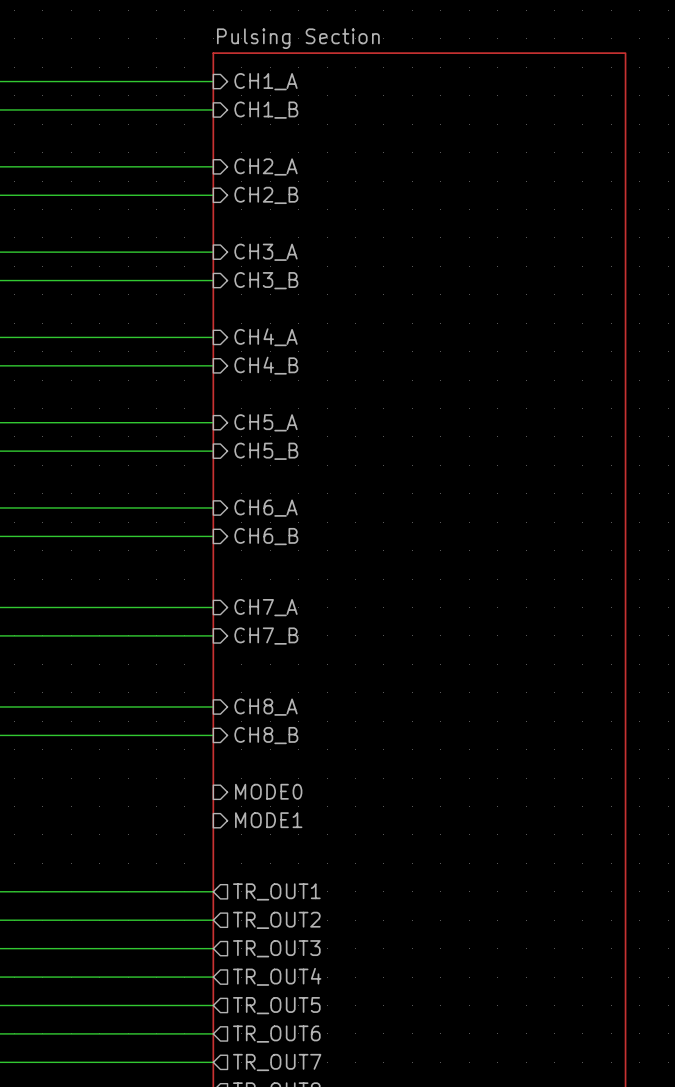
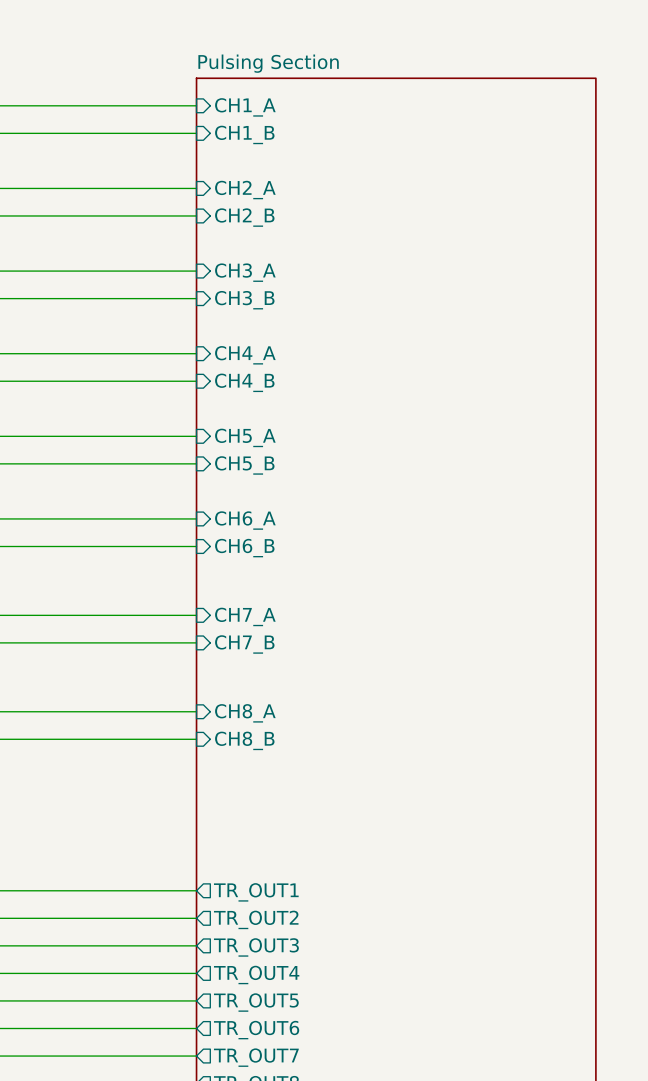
sheet pin: MODE0 (268, 791) -> none
sheet pin: MODE1 (268, 820) -> none

